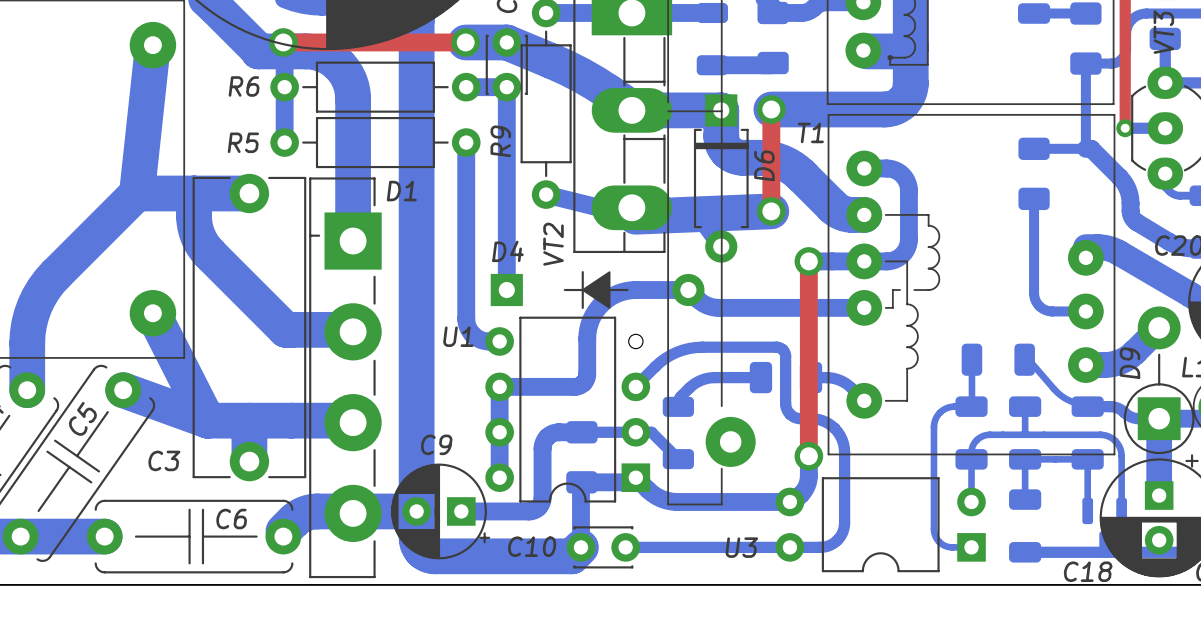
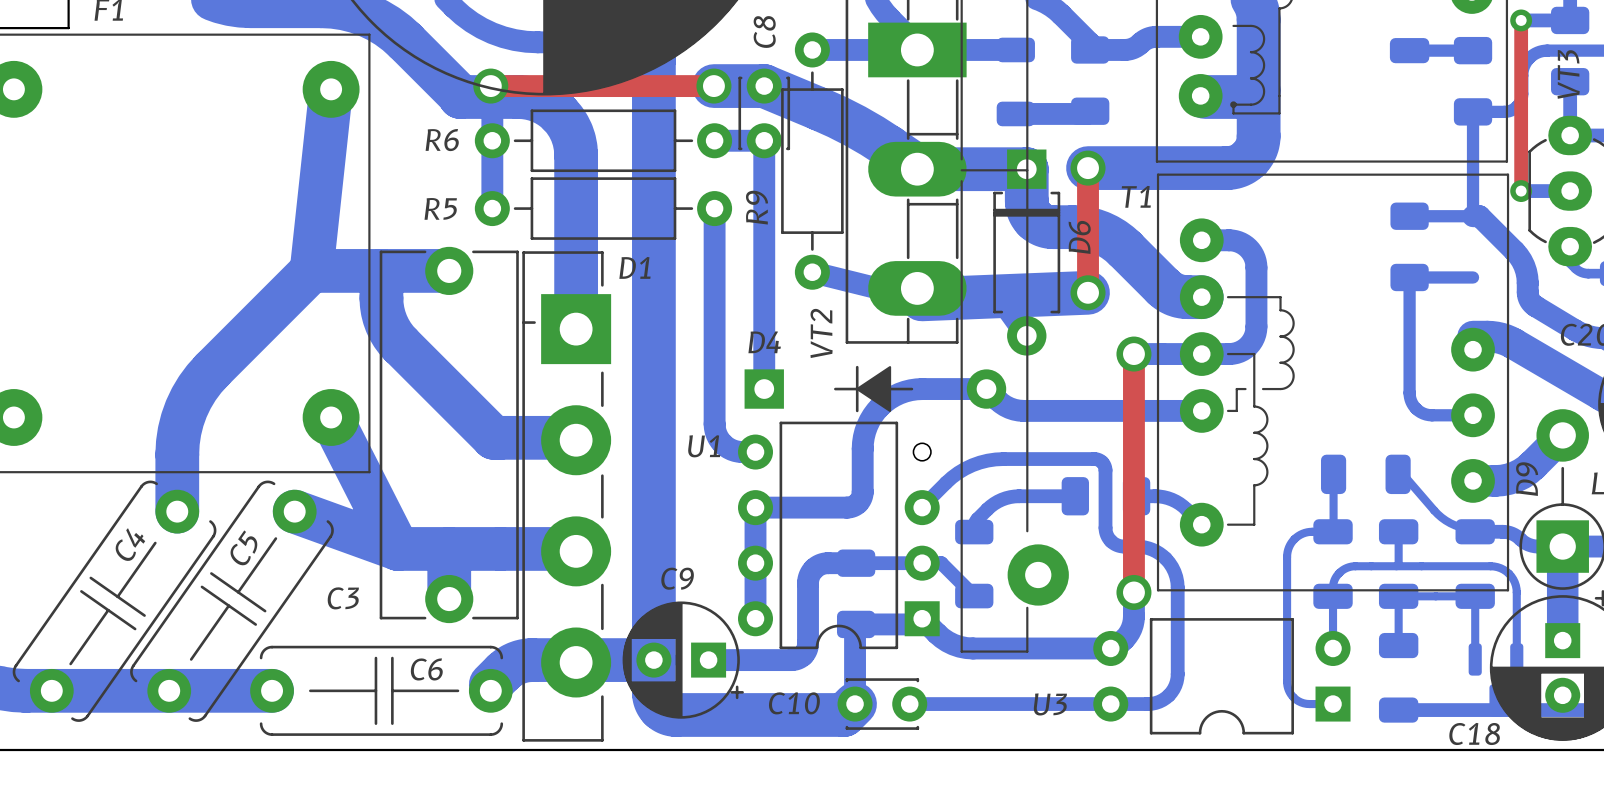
bottom track: none -> (1409, 277) (1473, 277)

